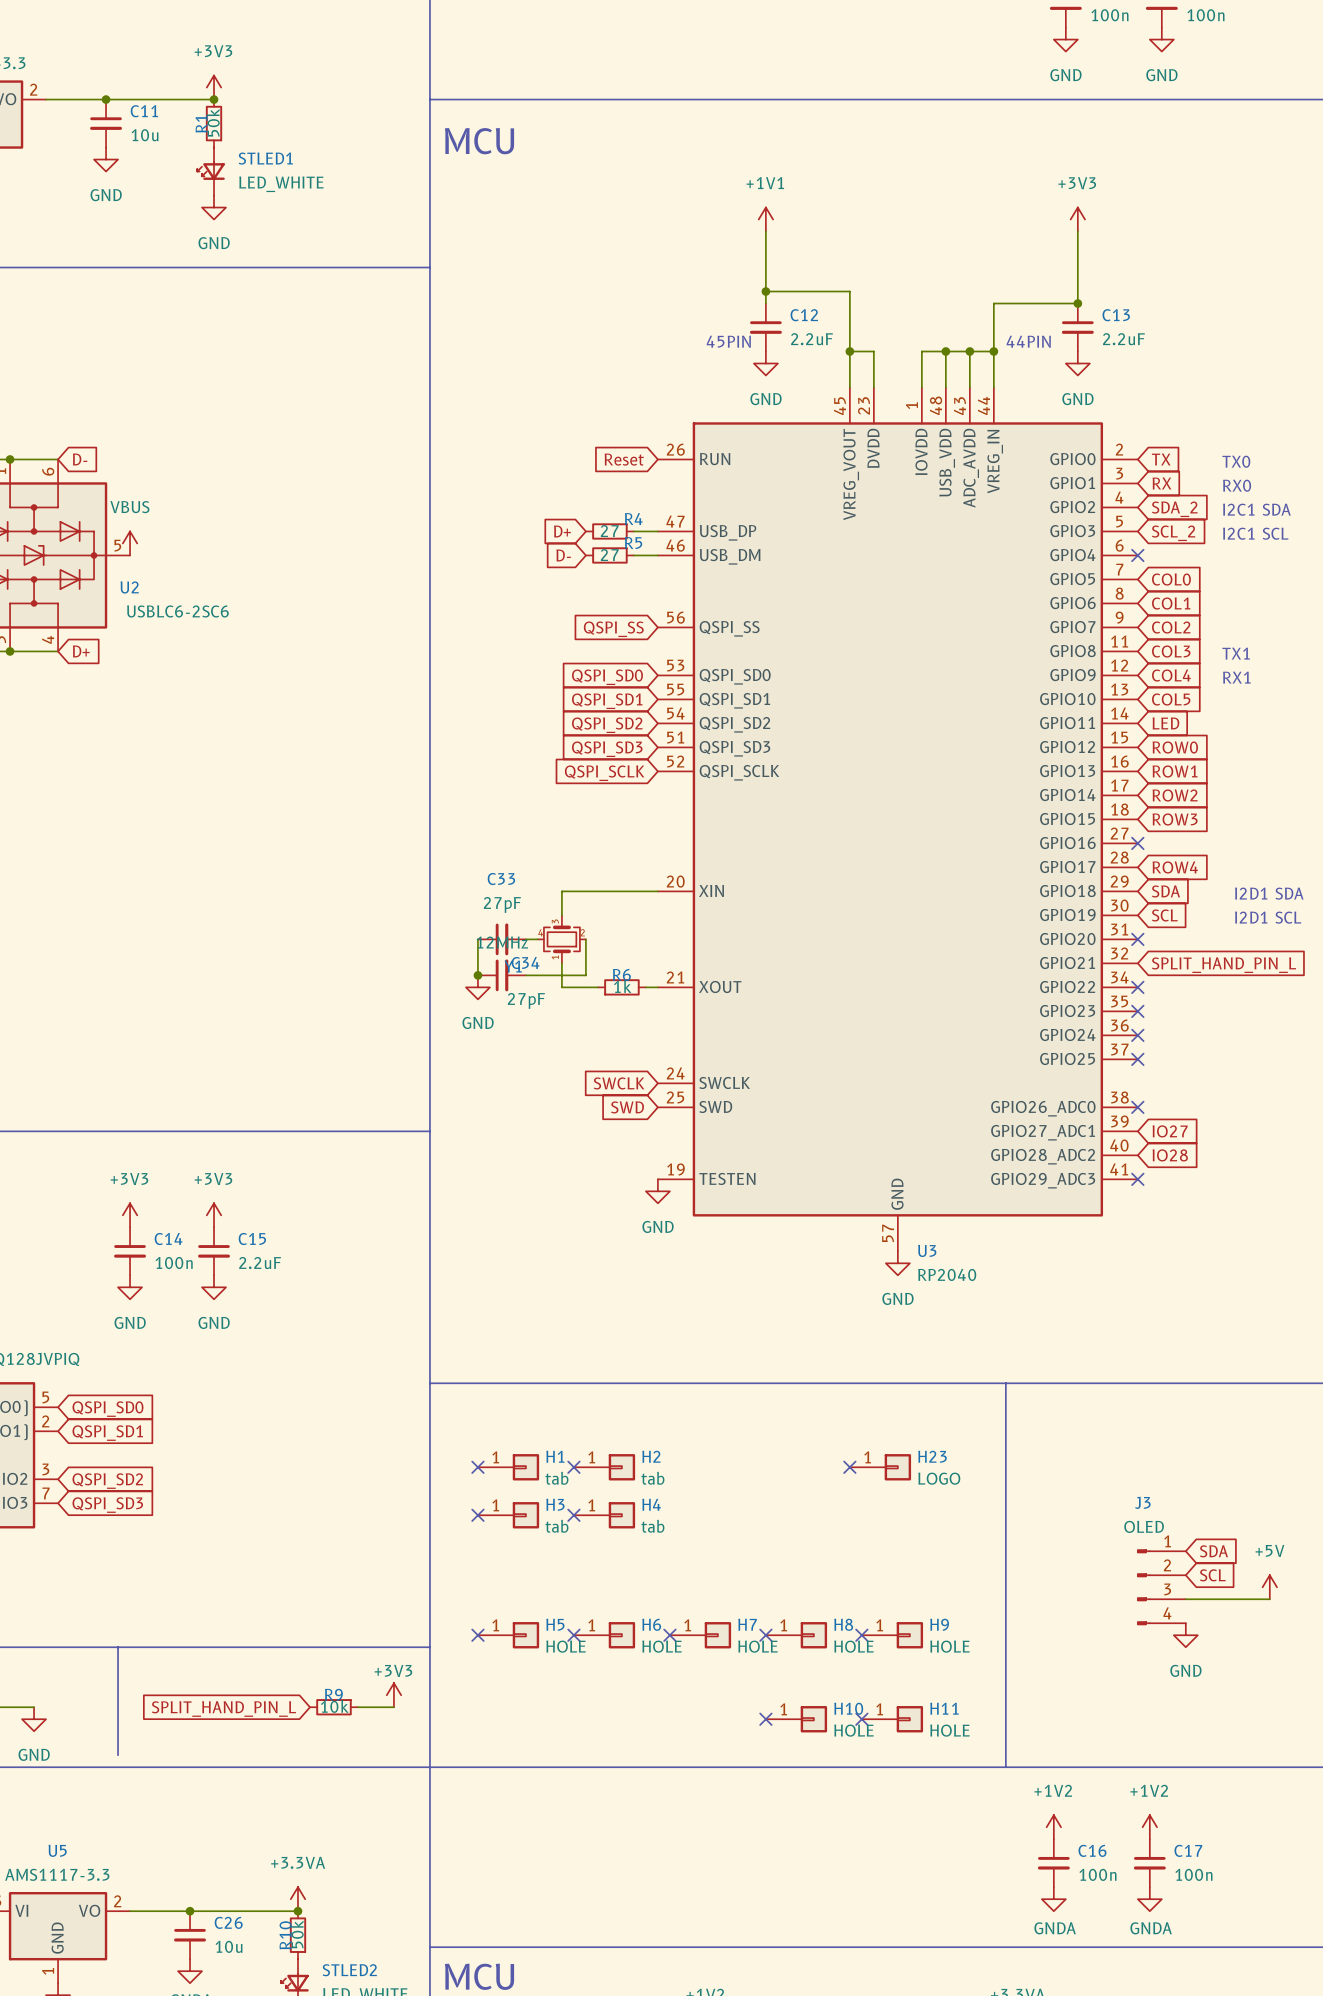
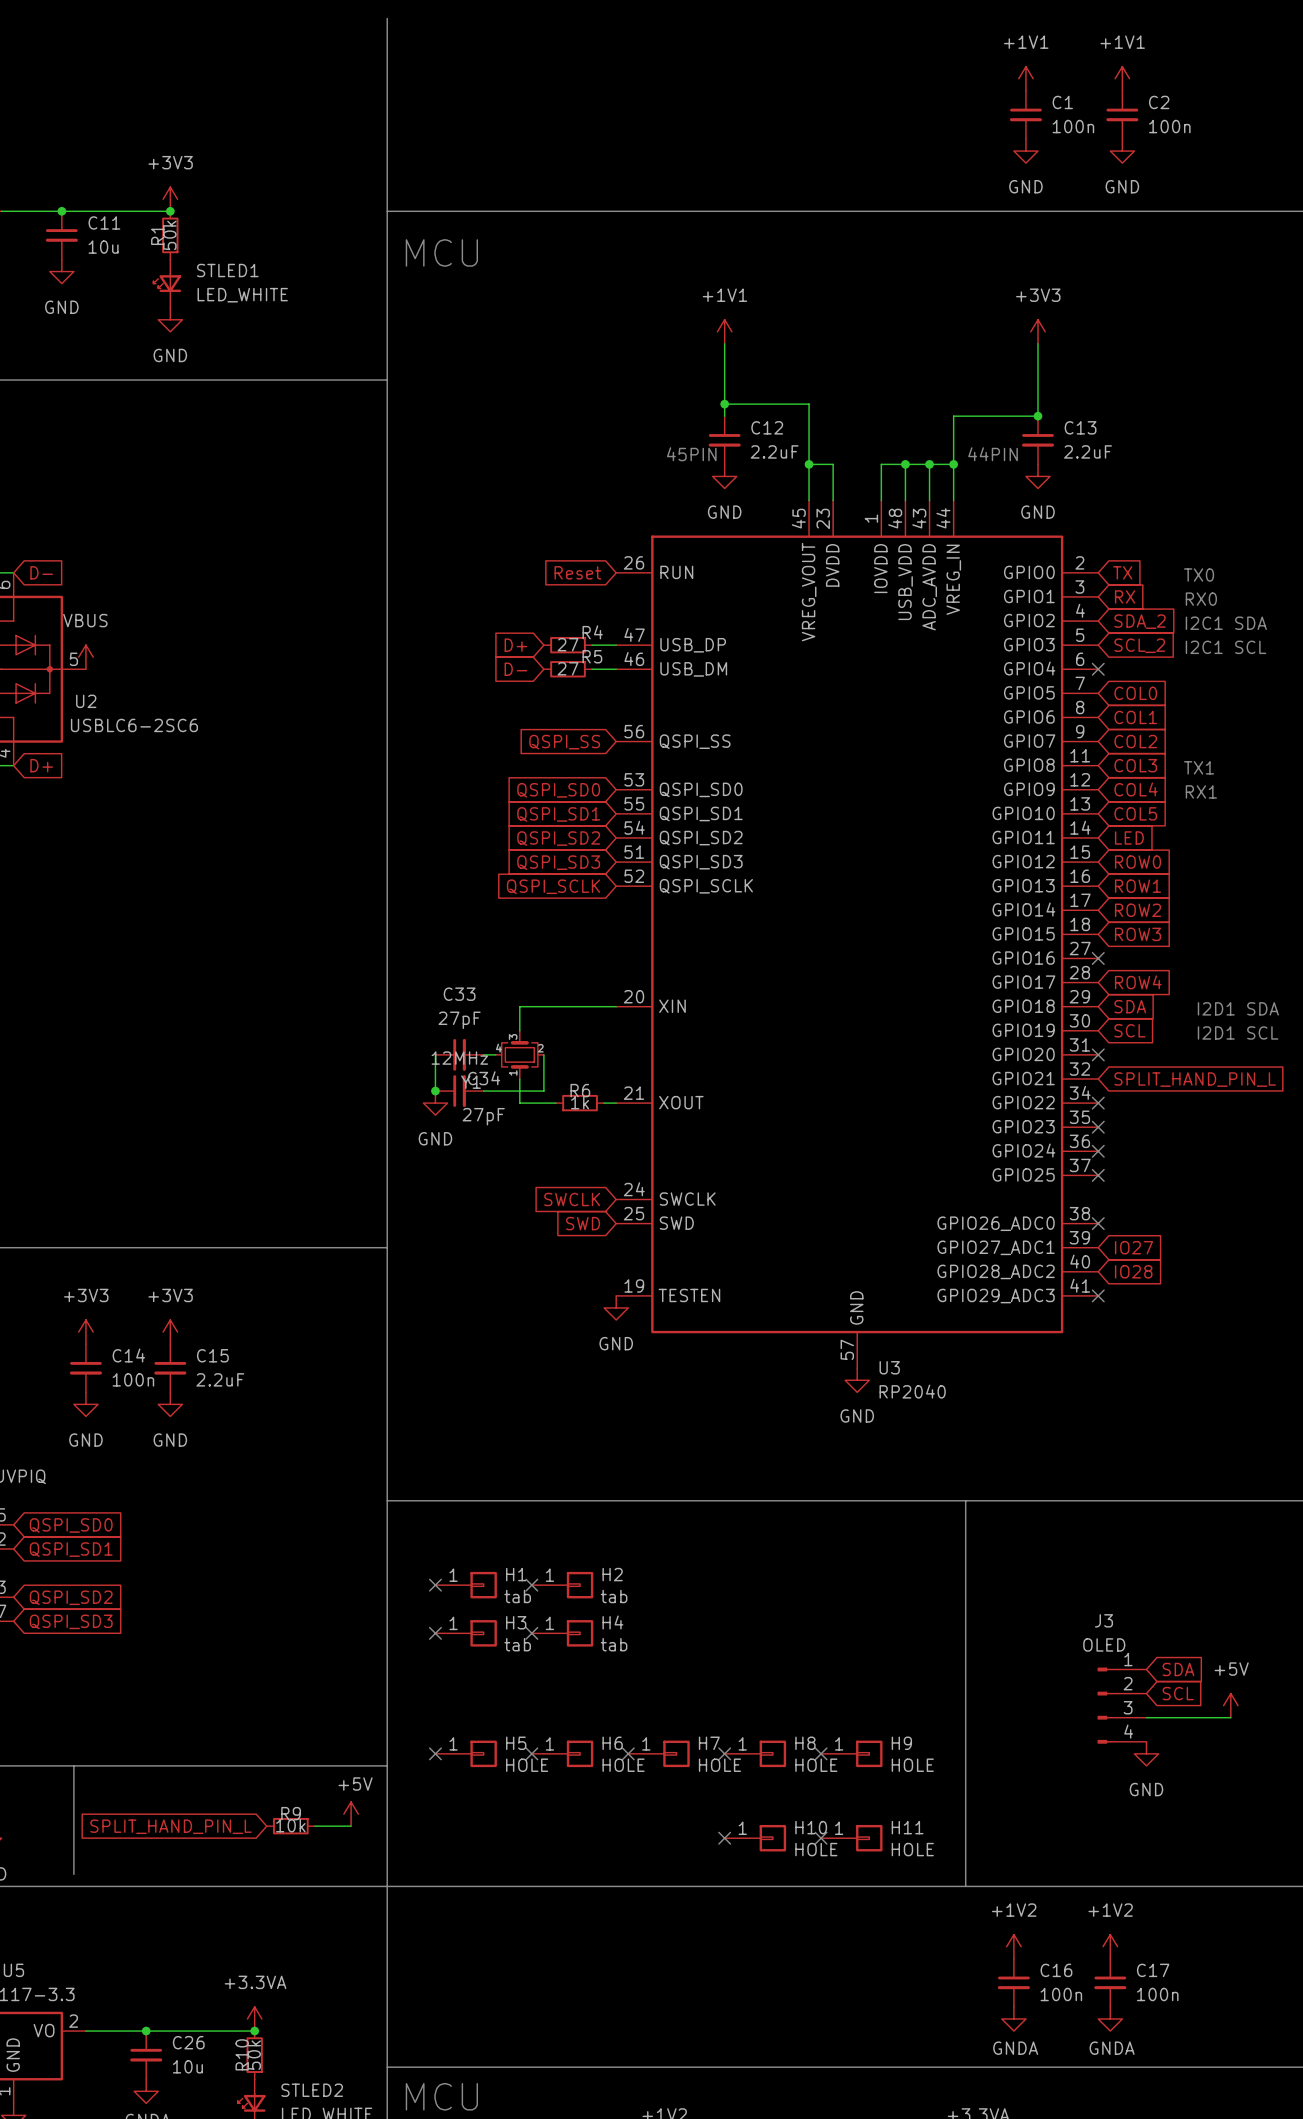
no-connect mark: (849, 1467) -> none
H23: LOGO (880, 1467) -> none
power symbol: +3V3 (393, 1695) -> +5V (351, 1814)

